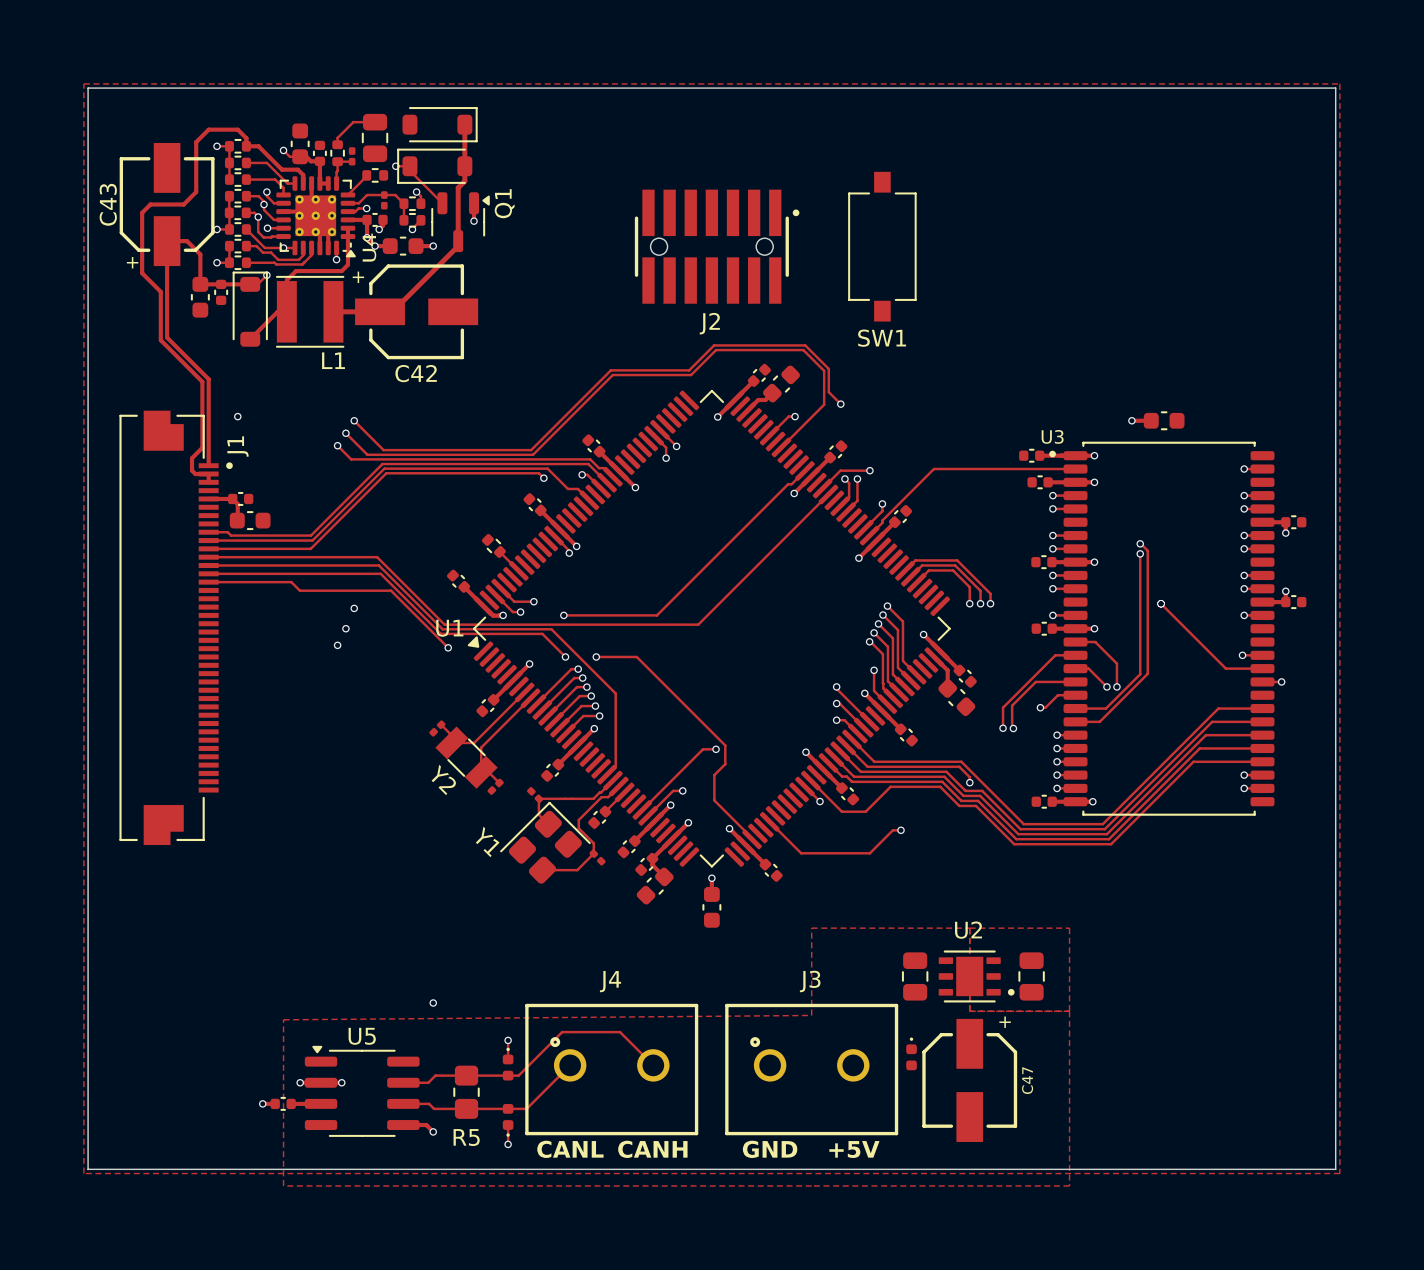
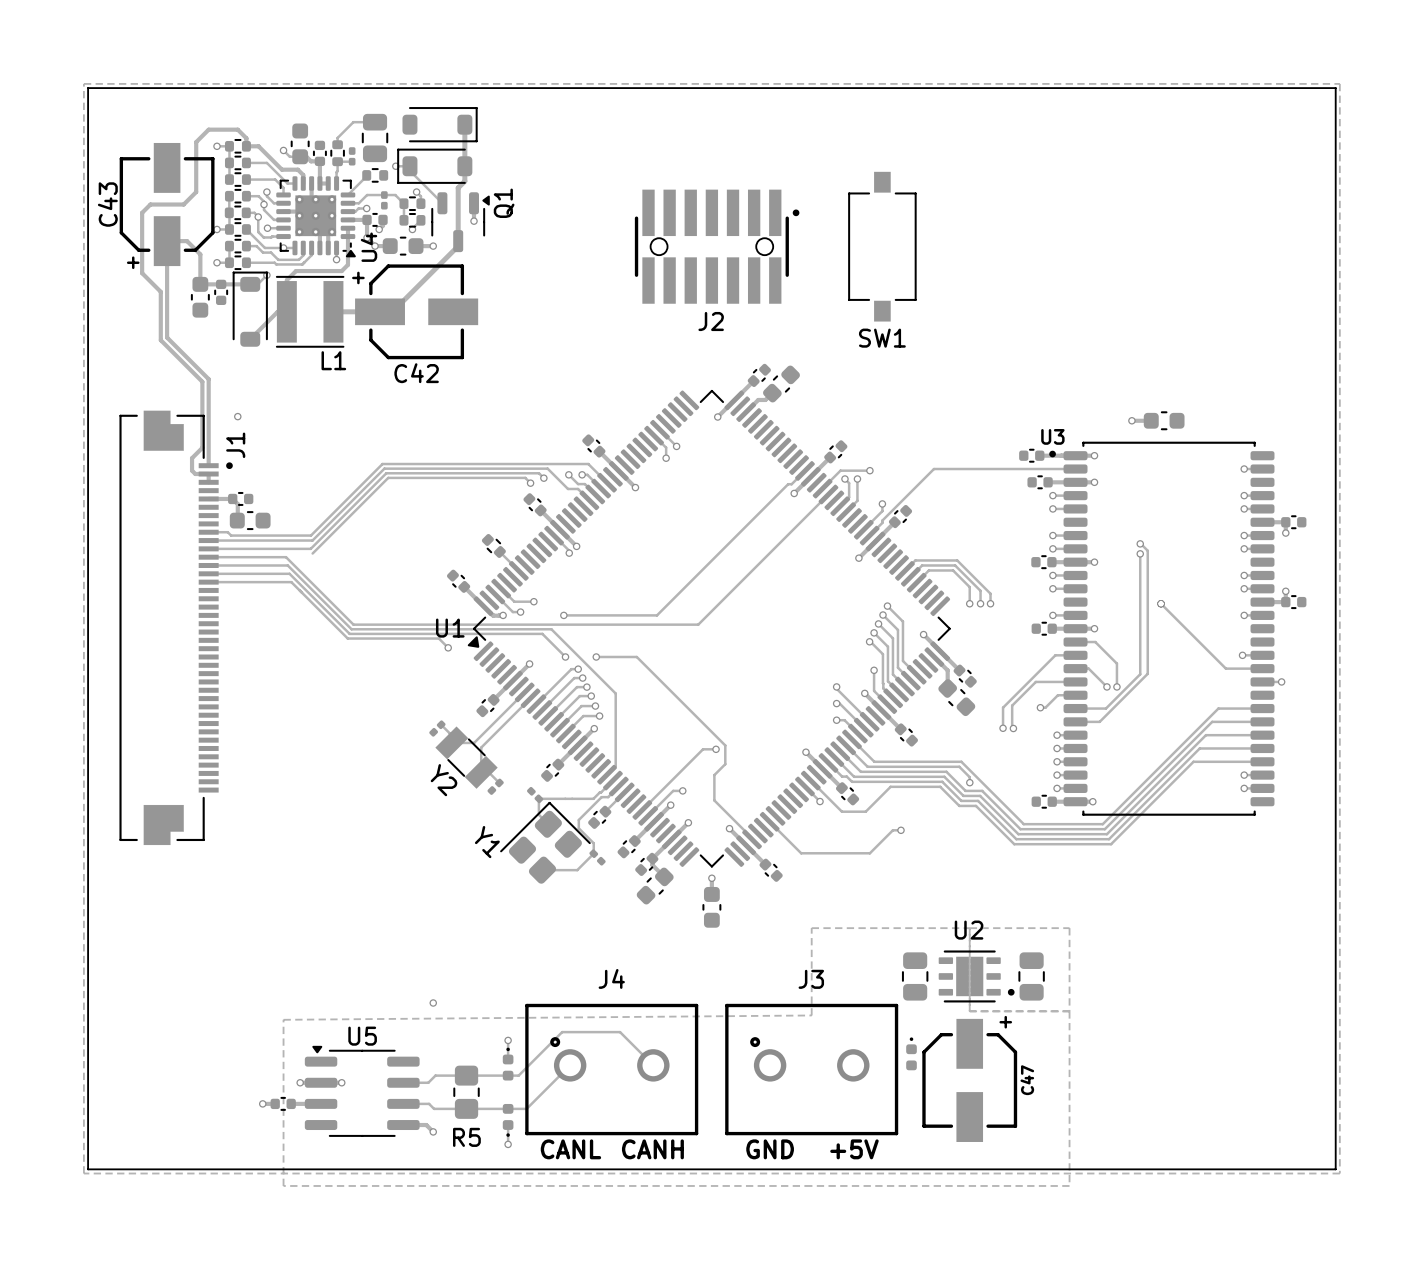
track: (840, 404) (828, 392) (828, 368) (805, 345) (714, 345) (689, 370) (610, 370) (531, 450) (383, 450) (354, 420) -> none
via: (840, 404) -> none
track: (795, 416) (788, 416) (769, 435) -> none
via: (795, 416) -> none
via: (354, 420) -> none
track: (345, 433) (367, 454) (533, 454) (612, 375) (691, 375) (716, 350) (803, 350) (824, 370) (824, 404) (781, 447) -> none
via: (345, 433) -> none
track: (337, 445) (351, 459) (590, 459) (599, 468) (604, 468) (612, 476) -> none
via: (337, 445) -> none
track: none -> (568, 474) (578, 484) (584, 484) (595, 494)
via: none -> (568, 474)
track: none -> (530, 483) (525, 477) (388, 477) (312, 553)
via: none -> (530, 483)
track: (286, 557) (377, 557) (444, 624) -> (286, 557) (353, 624) (444, 624)
track: (287, 565) (378, 565) (442, 629) -> (287, 565) (351, 629) (442, 629)
track: (289, 573) (380, 573) (440, 633) -> (289, 573) (349, 633) (440, 633)
track: (299, 590) (391, 590) (438, 638) -> (299, 590) (347, 638) (438, 638)
via: (354, 608) -> none
via: (345, 628) -> none
via: (337, 645) -> none

